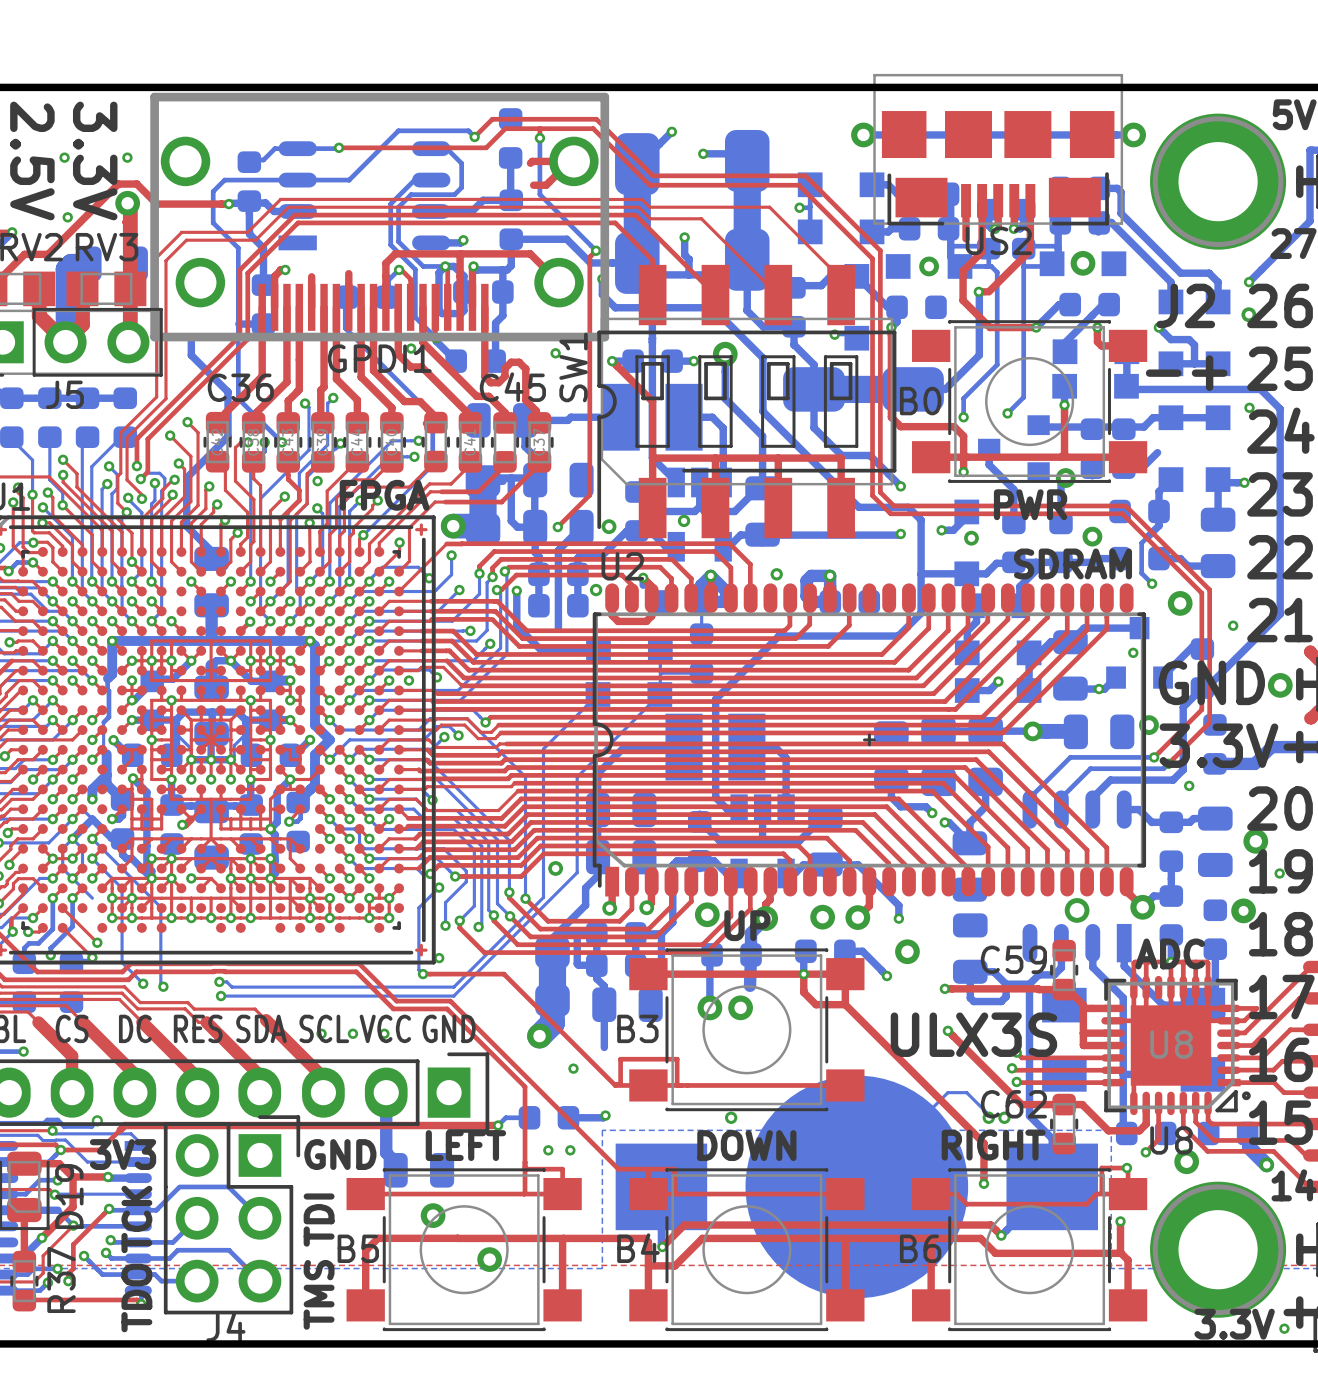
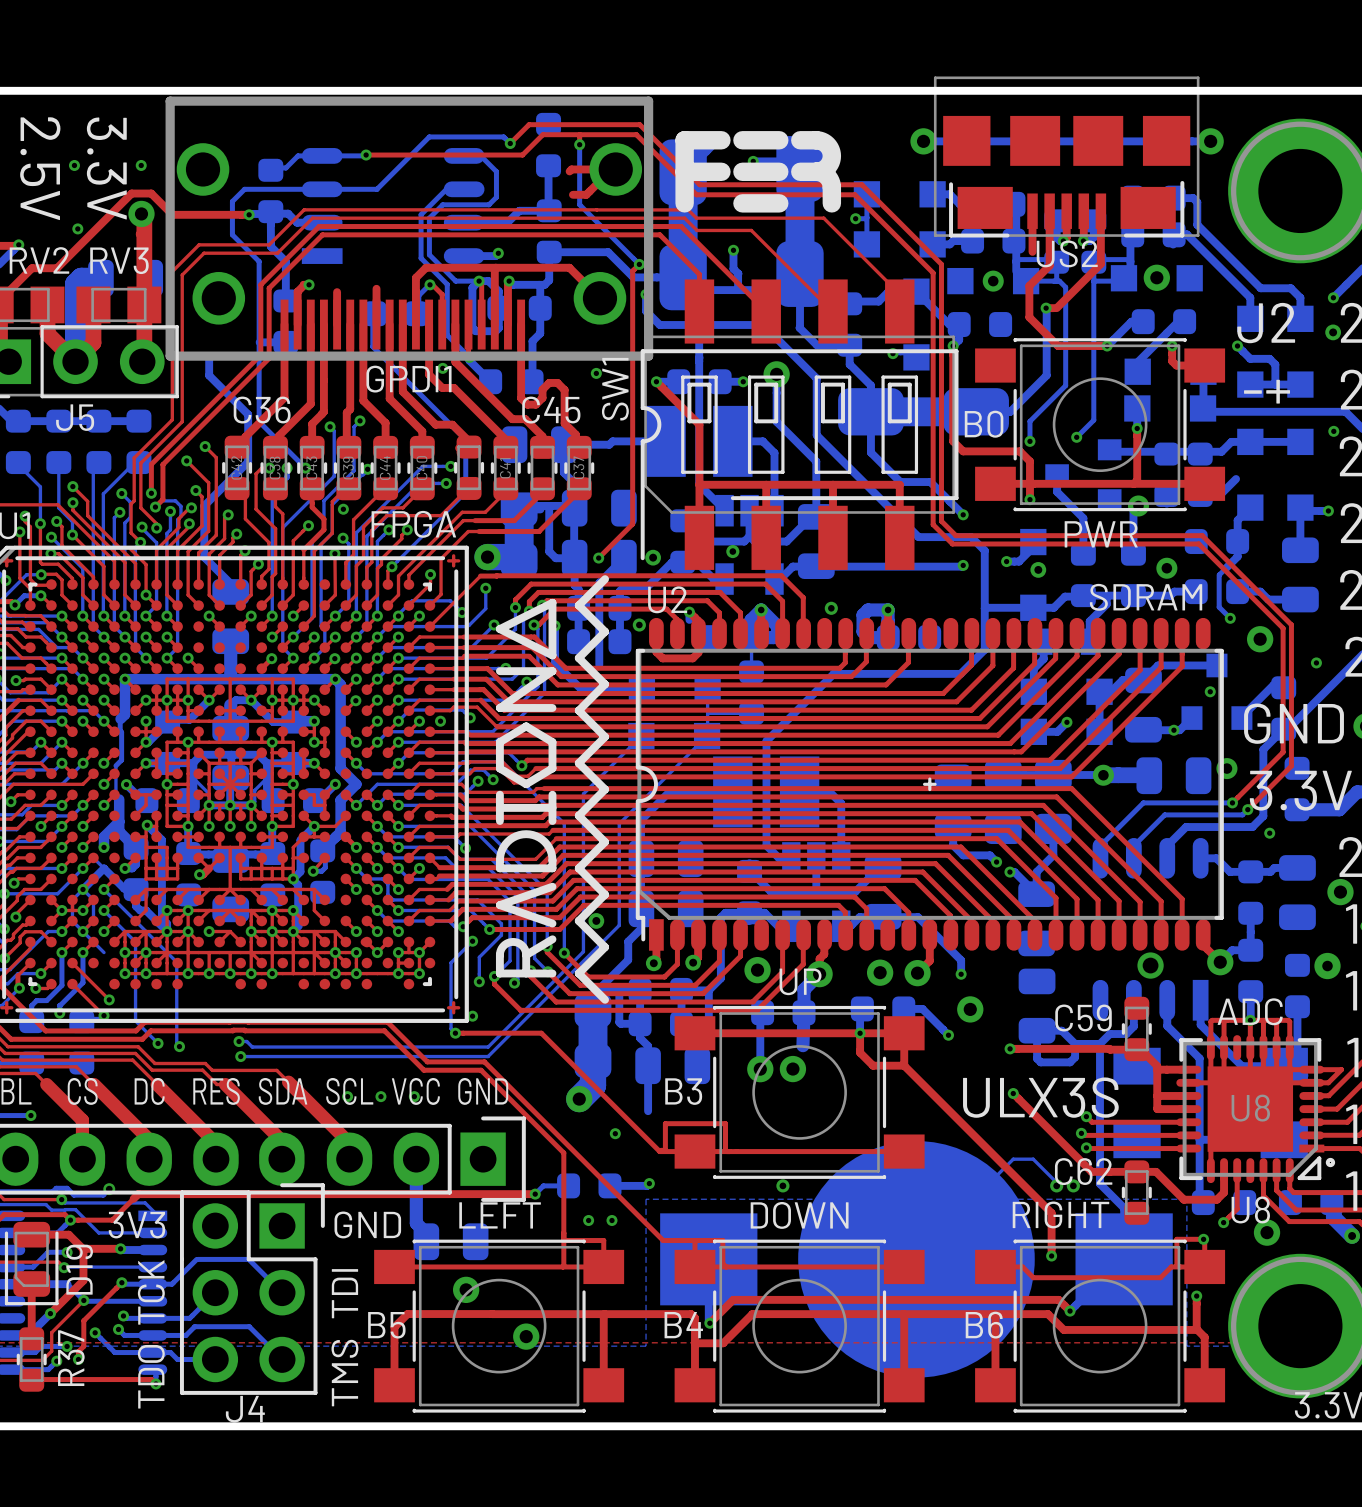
drawing: none -> [675, 131, 842, 213]
drawing: none -> [495, 575, 610, 1004]

